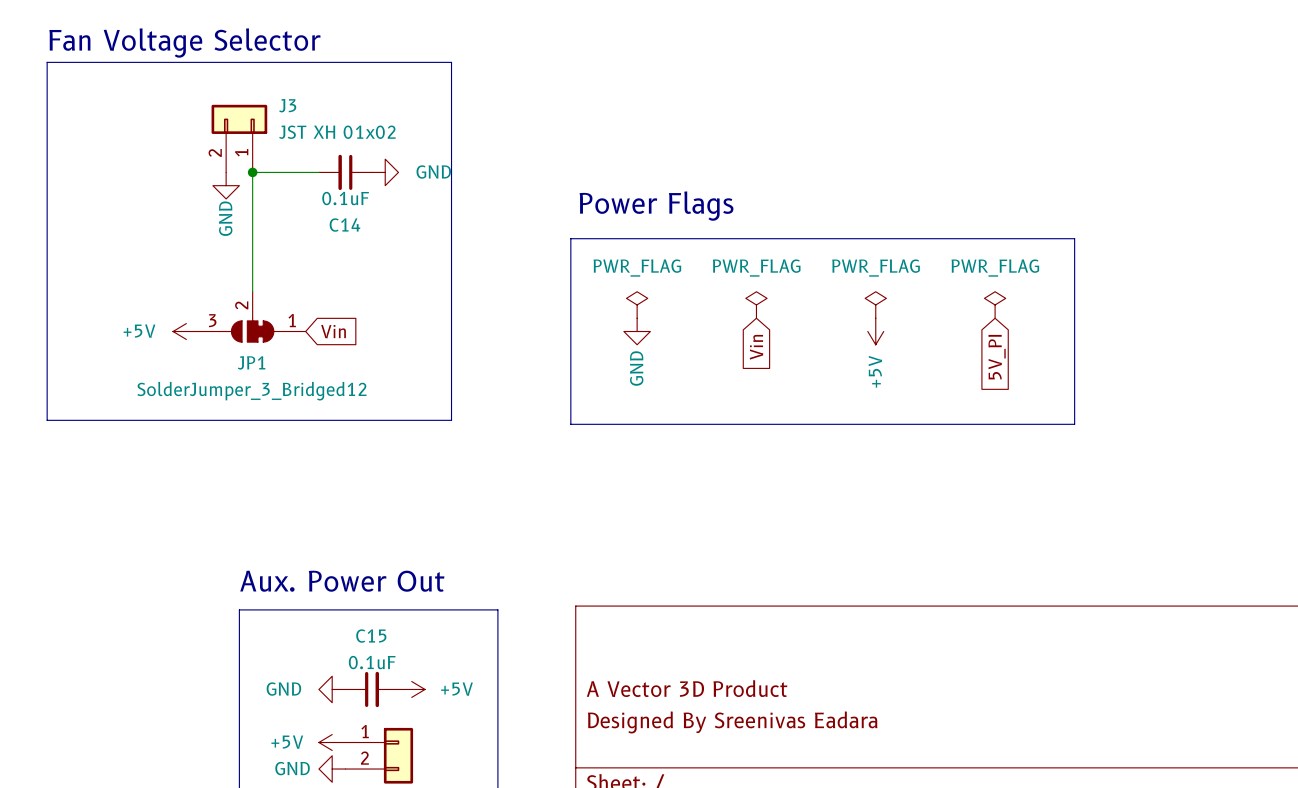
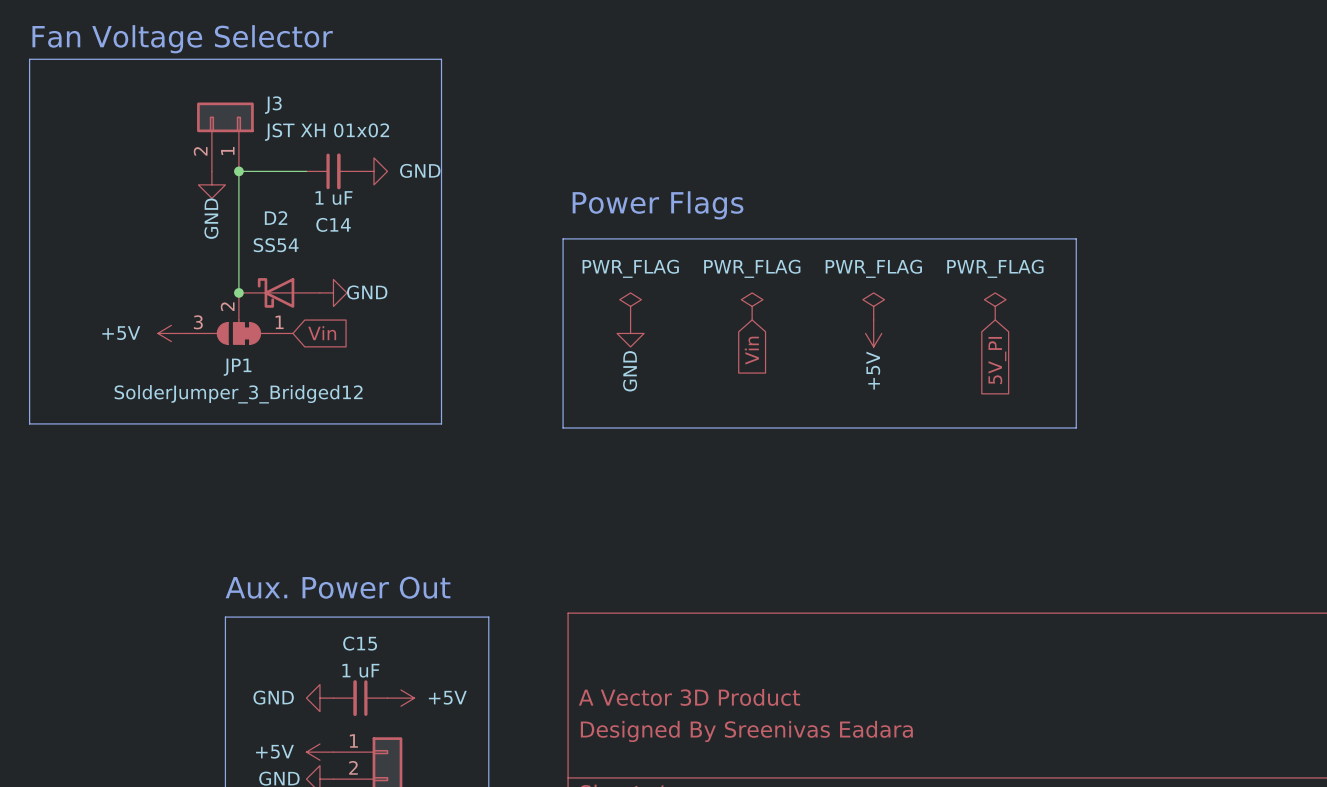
C14 rotation: 0° (345, 172) -> 180° (333, 171)
C14 value: 0.1uF (345, 198) -> 1 uF (334, 198)
junction: none -> (238, 292)
D2: none -> SS54 (279, 292)
power symbol: none -> GND (333, 292)
C15 value: 0.1uF (372, 662) -> 1 uF (360, 670)
C15 rotation: 0° (372, 689) -> 180° (360, 698)

